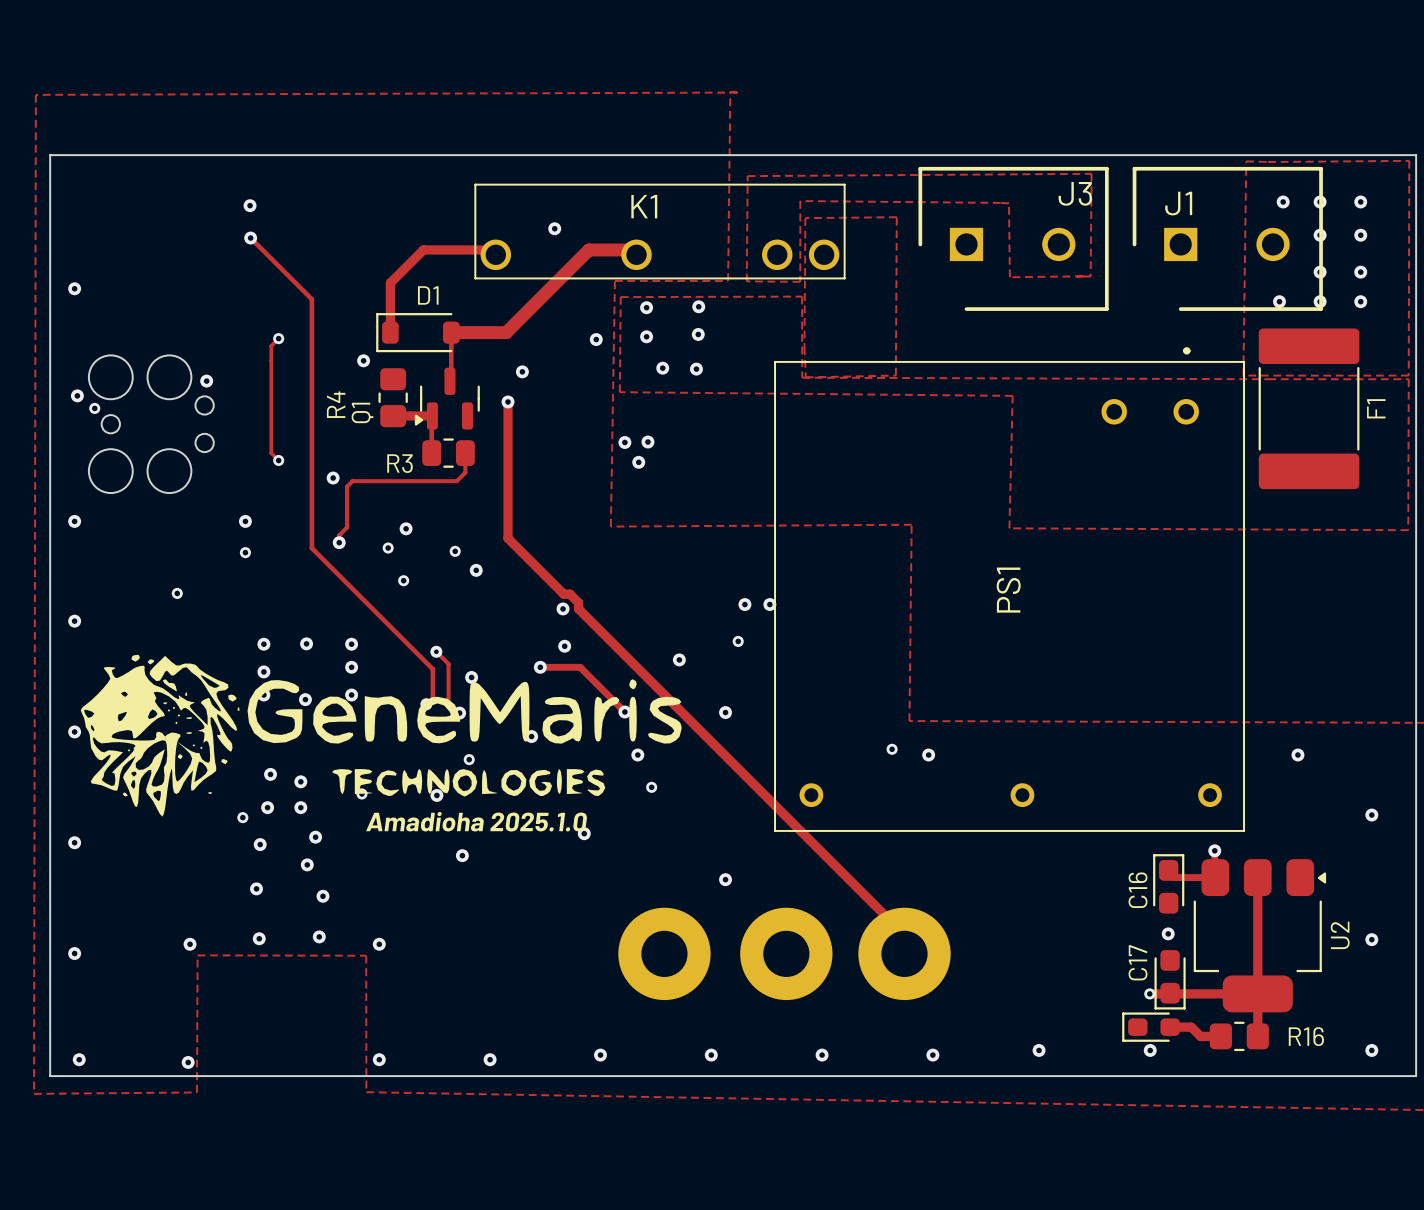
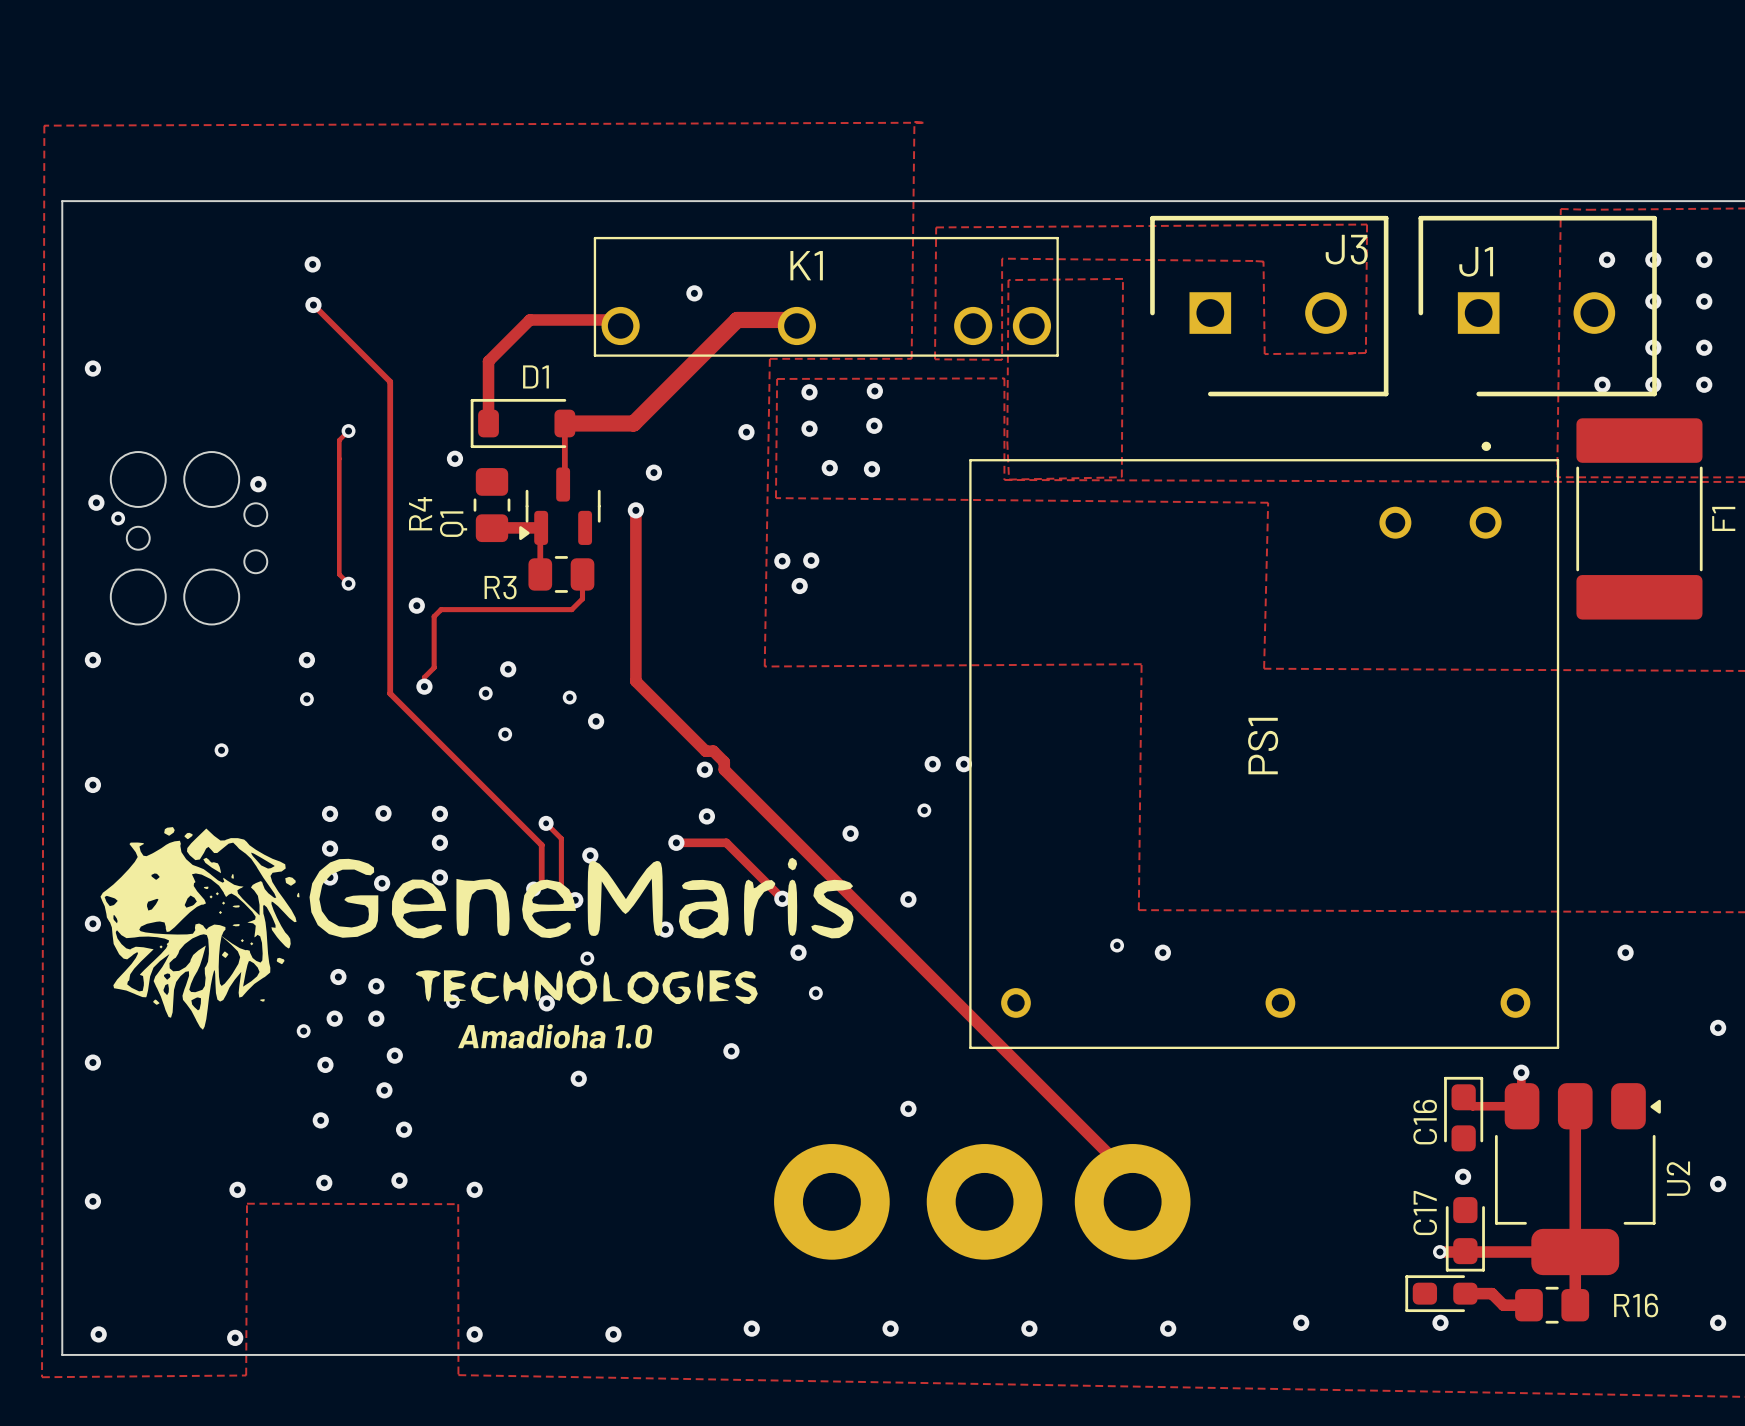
text: Amadioha 2025.1.0 (476, 821) -> Amadioha 1.0 (555, 1036)

